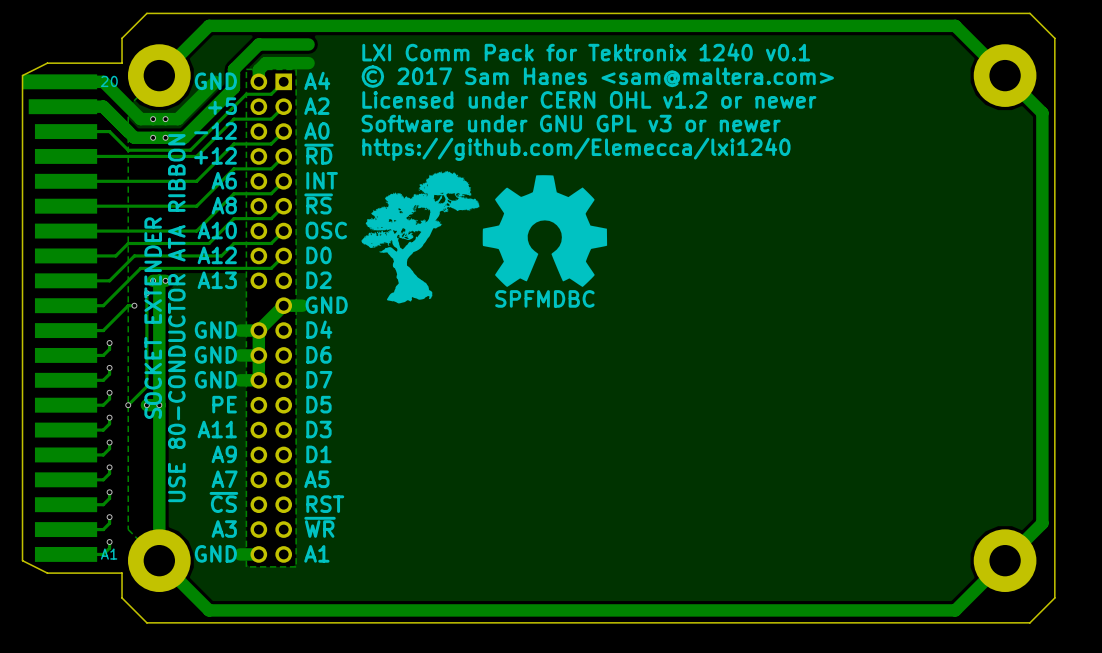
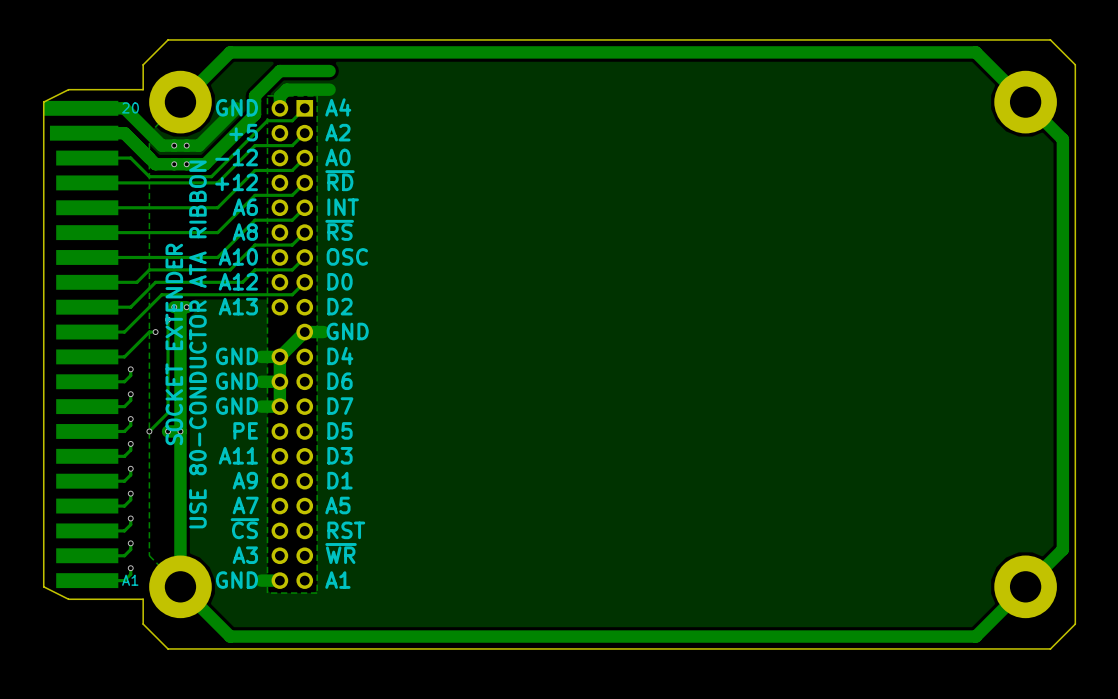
text: LXI Comm Pack for Tektronix 1240 v0.1 (586, 52) -> none
text: © 2017 Sam Hanes <sam@maltera.com> (597, 76) -> none
text: Licensed under CERN OHL v1.2 or newer (589, 99) -> none
text: Software under GNU GPL v3 or newer (571, 123) -> none
text: https://github.com/Elemecca/lxi1240 (576, 149) -> none
drawing: [361, 170, 608, 304] -> none
text: SPFMDBC (544, 298) -> none

